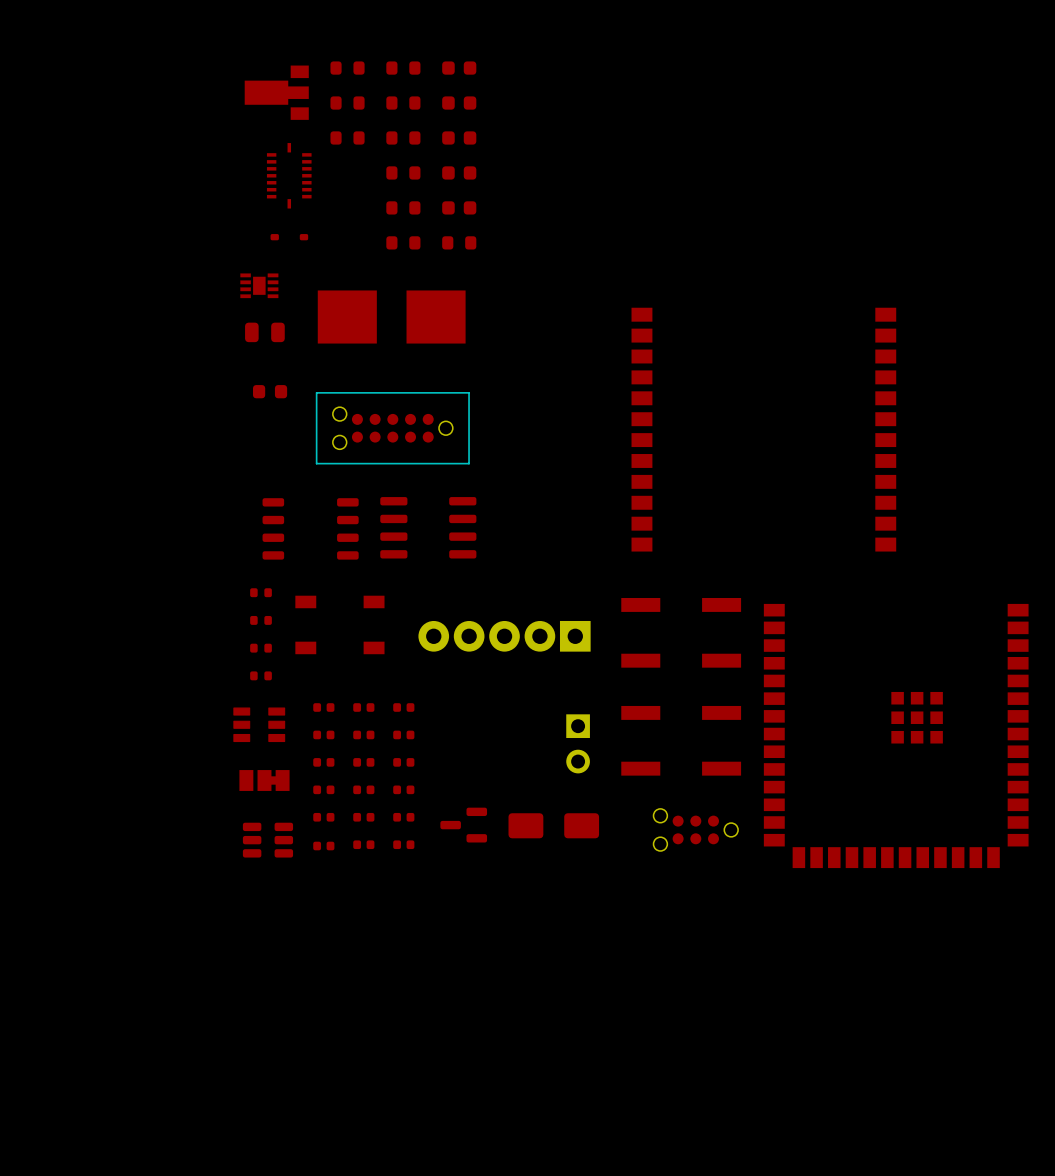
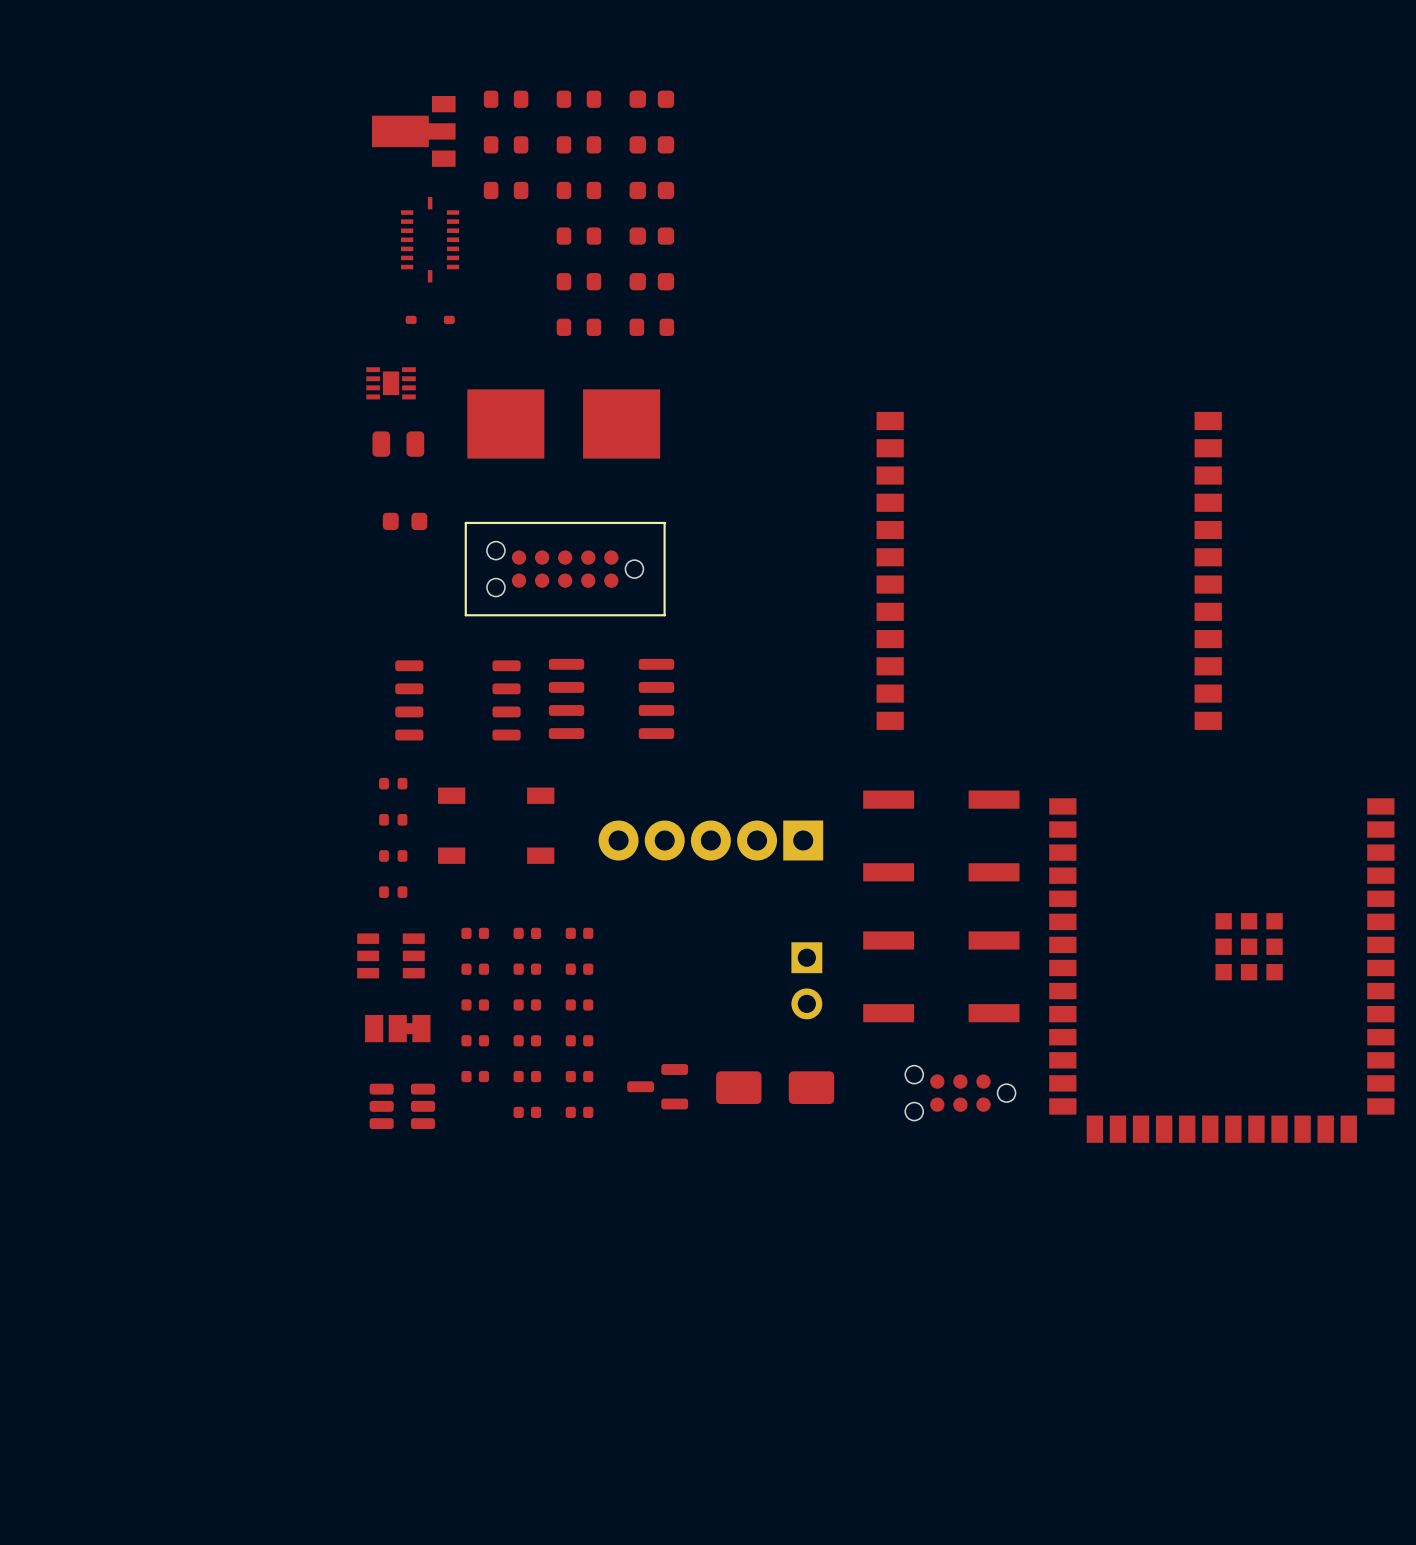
part: (323, 846) -> none

